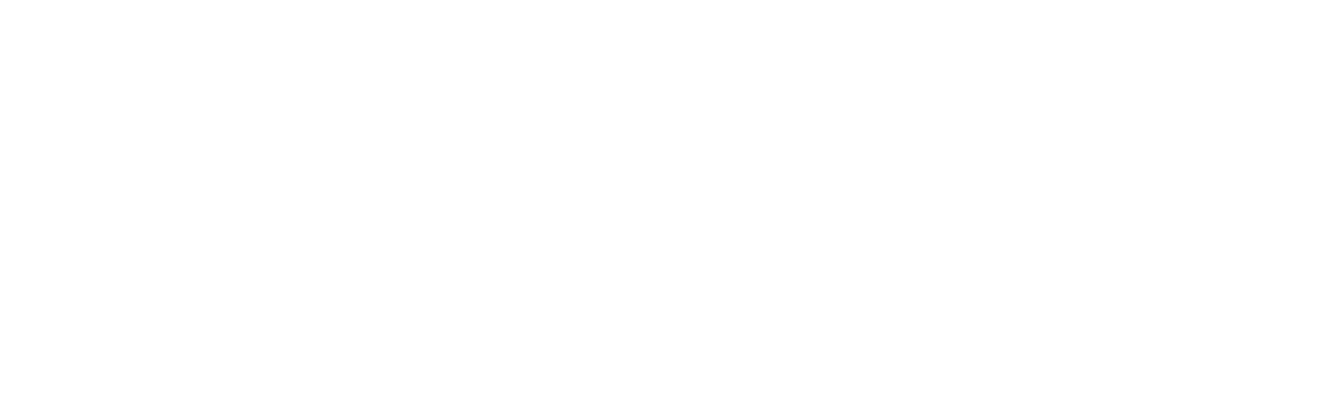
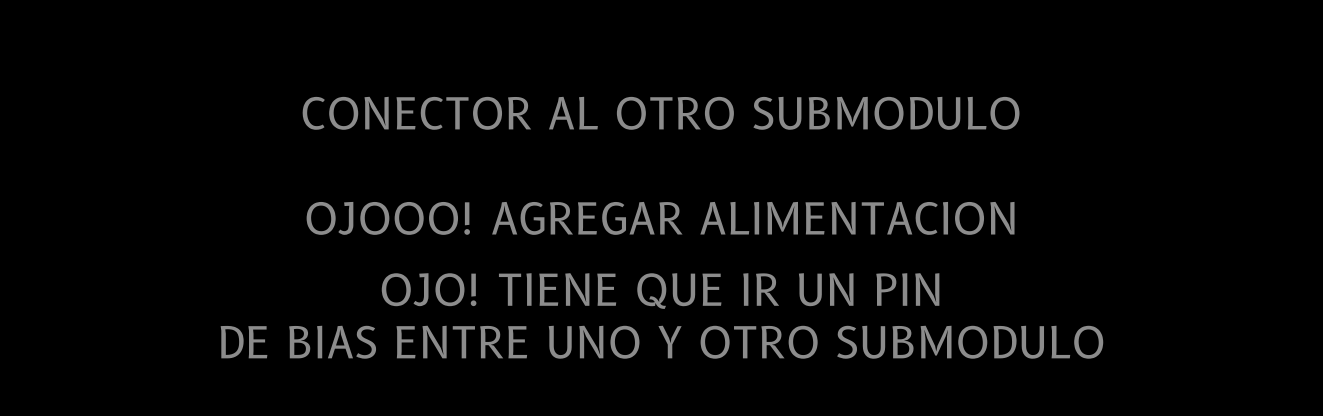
text: none -> CONECTOR AL OTRO SUBMODULO (661, 113)
text: none -> OJOOO! AGREGAR ALIMENTACION (660, 218)
text: none -> OJO! TIENE QUE IR UN PIN (660, 291)
text: none -> DE BIAS ENTRE UNO Y OTRO SUBMODULO (661, 342)

